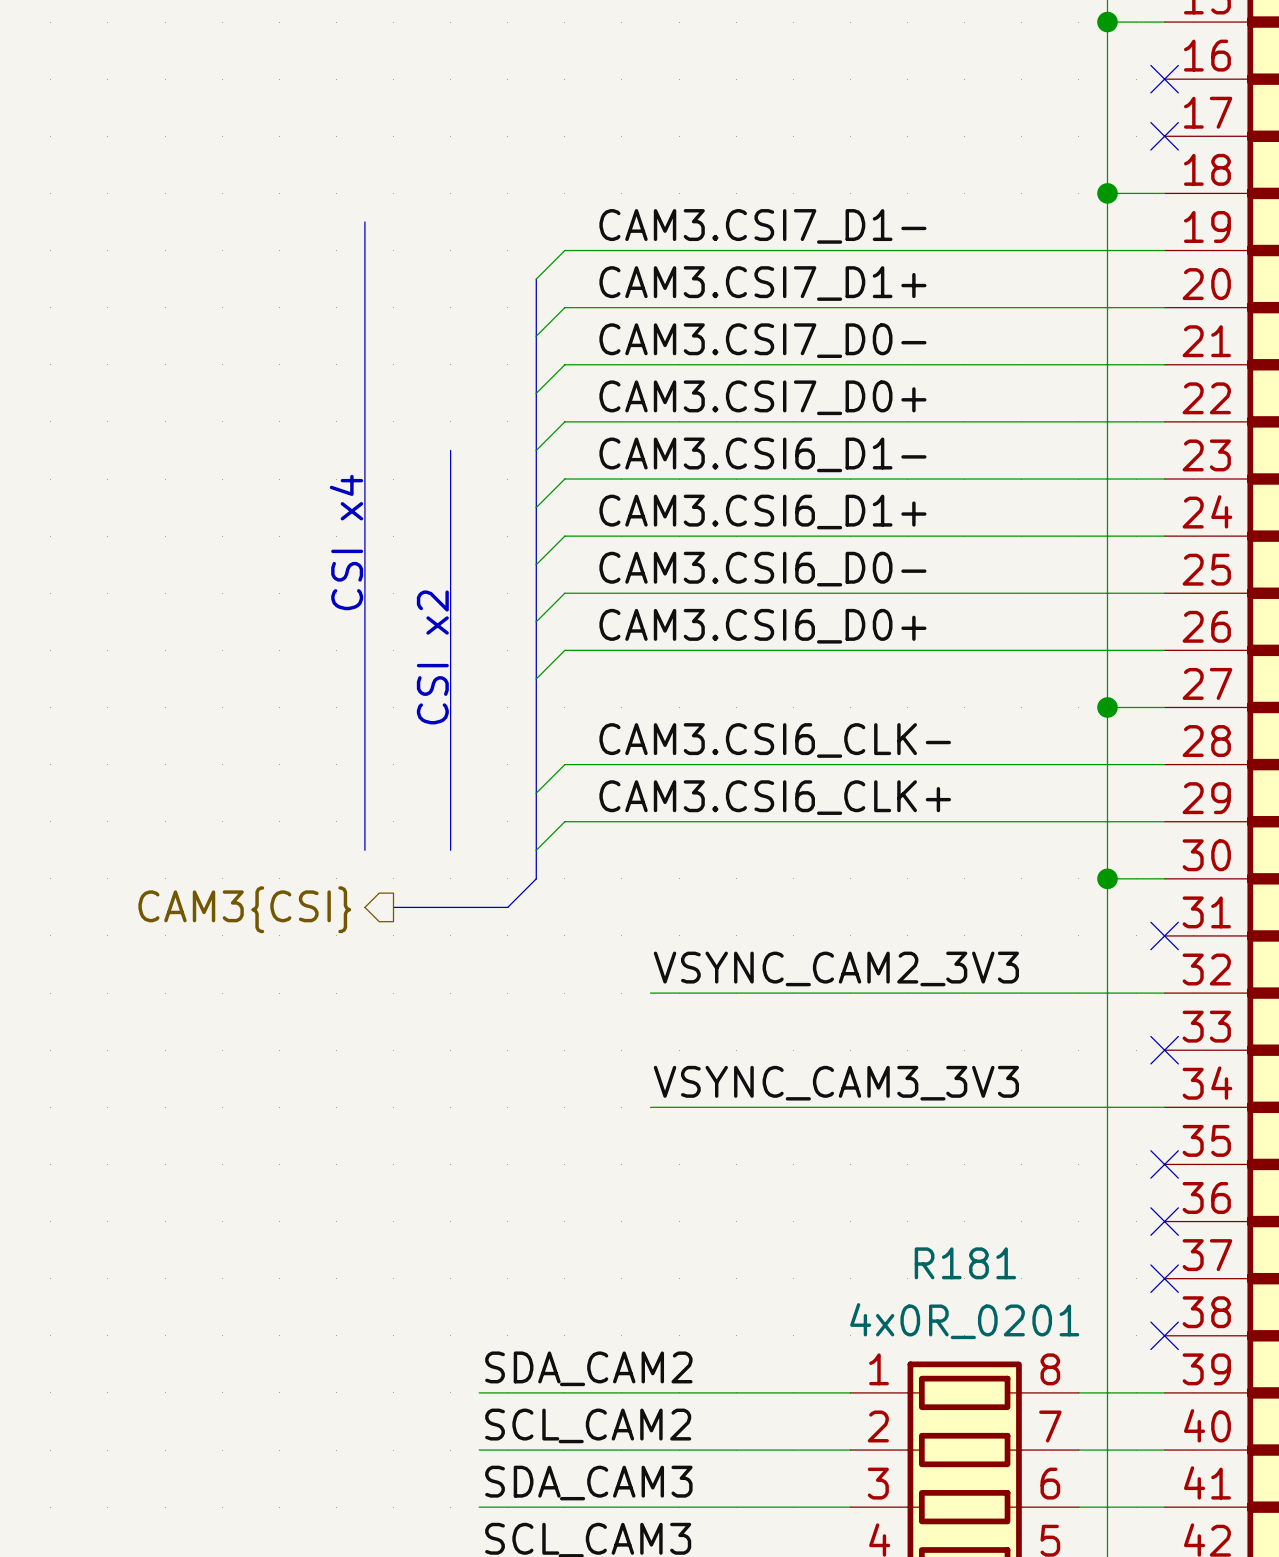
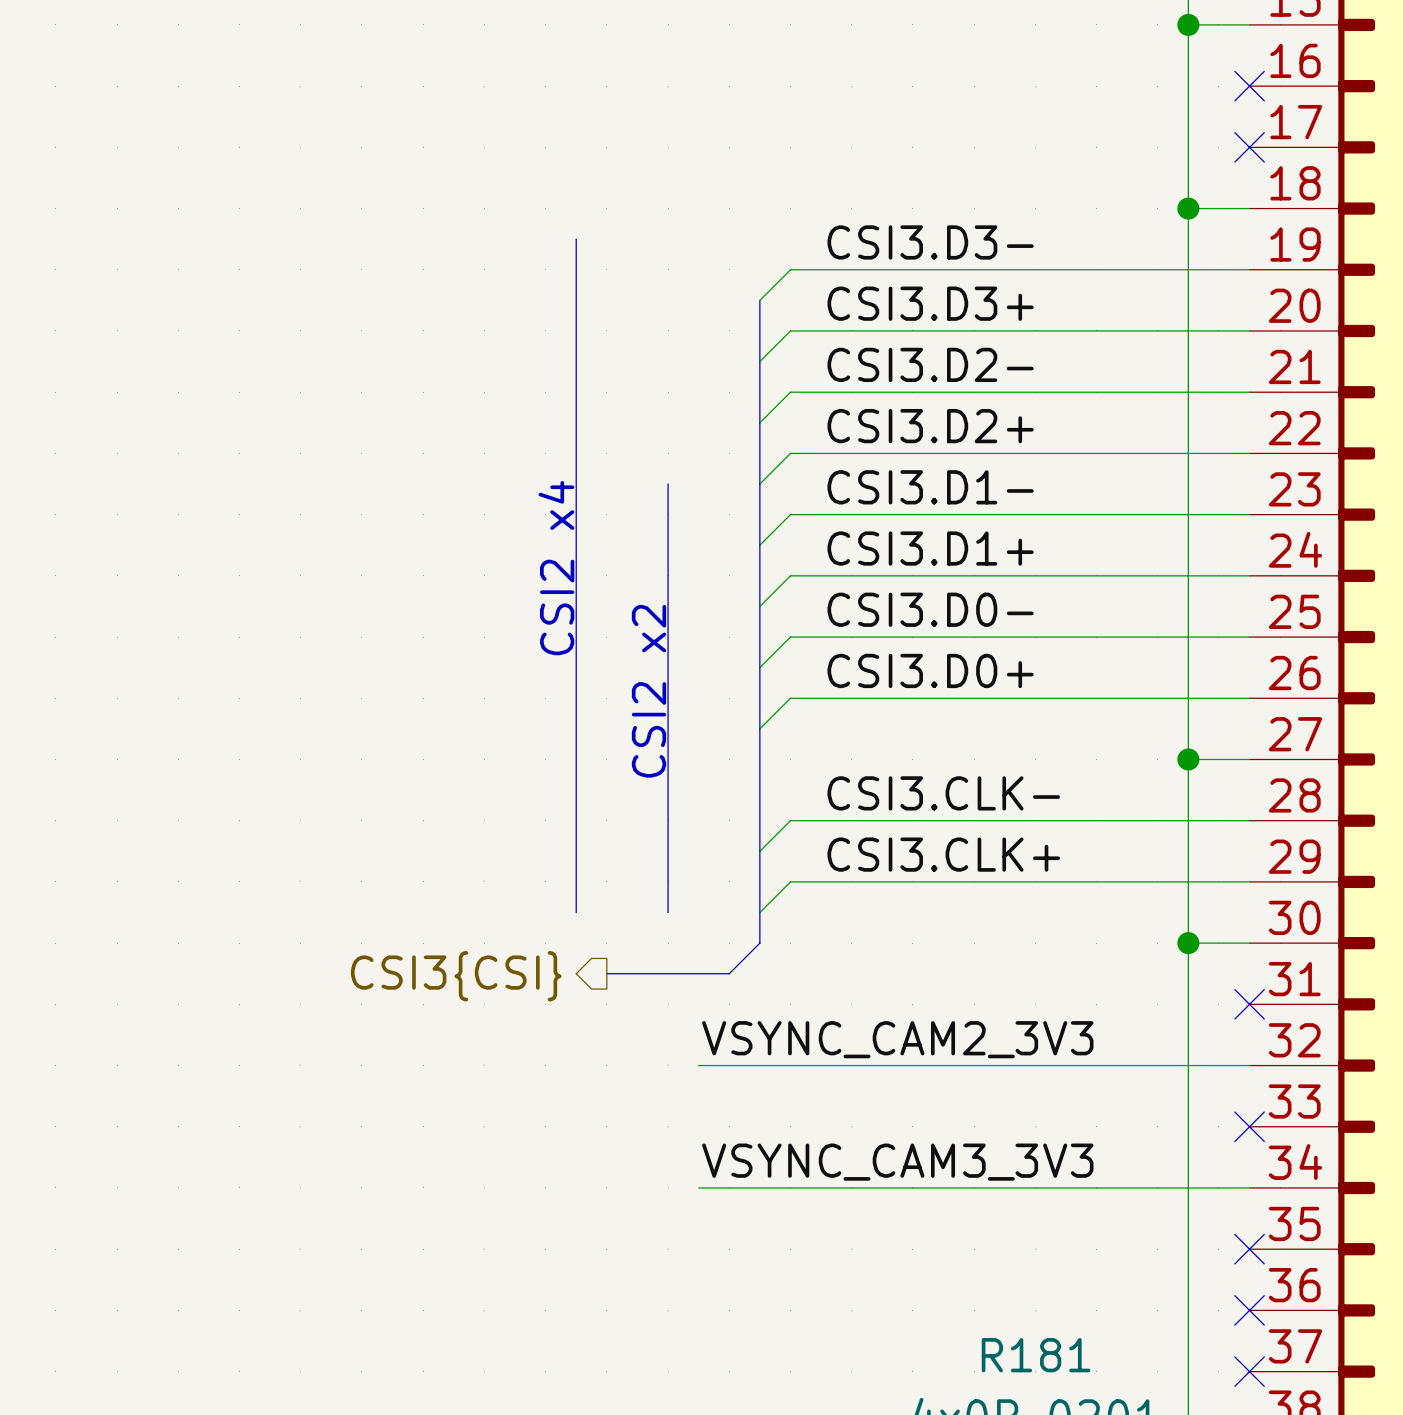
line: (364, 221) (364, 850) -> (576, 239) (576, 912)
label: none -> CSI3.D3- (930, 242)
label: CAM3.CSI7_D1- (762, 226) -> none
wire: (736, 250) (564, 250) (536, 279) -> (790, 269) (759, 300)
bus: (536, 279) (536, 878) (507, 907) (393, 907) -> (759, 300) (759, 943) (729, 973) (606, 973)
label: none -> CSI3.D3+ (930, 303)
label: CAM3.CSI7_D1+ (762, 283) -> none
wire: (736, 307) (564, 307) (536, 336) -> (790, 330) (759, 361)
label: none -> CSI3.D2- (930, 364)
label: CAM3.CSI7_D0- (762, 340) -> none
wire: (736, 364) (564, 364) (536, 393) -> (790, 392) (759, 422)
label: none -> CSI3.D2+ (930, 426)
label: CAM3.CSI7_D0+ (762, 397) -> none
wire: (736, 421) (564, 421) (536, 450) -> (790, 453) (759, 484)
line: (450, 450) (450, 850) -> (668, 484) (668, 912)
label: none -> CSI3.D1- (930, 487)
label: CAM3.CSI6_D1- (762, 454) -> none
wire: (736, 479) (564, 479) (536, 507) -> (790, 514) (759, 545)
label: none -> CSI3.D1+ (930, 548)
label: CAM3.CSI6_D1+ (762, 512) -> none
text: none -> CSI2 x4 (556, 568)
wire: (736, 536) (564, 536) (536, 564) -> (790, 575) (759, 606)
text: CSI x4 (346, 542) -> none
label: none -> CSI3.D0- (930, 609)
label: CAM3.CSI6_D0- (762, 569) -> none
wire: (736, 593) (564, 593) (536, 621) -> (790, 637) (759, 667)
label: none -> CSI3.D0+ (930, 670)
label: CAM3.CSI6_D0+ (762, 626) -> none
text: none -> CSI2 x2 (649, 691)
wire: (736, 650) (564, 650) (536, 678) -> (790, 698) (759, 728)
text: CSI x2 (432, 657) -> none
label: CAM3.CSI6_CLK- (775, 740) -> CSI3.CLK- (943, 793)
wire: (736, 764) (564, 764) (536, 793) -> (790, 820) (759, 851)
label: CAM3.CSI6_CLK+ (775, 797) -> CSI3.CLK+ (943, 854)
wire: (736, 821) (564, 821) (536, 850) -> (790, 881) (759, 912)
hierarchical label: CAM3{CSI} (244, 909) -> CSI3{CSI} (456, 976)

